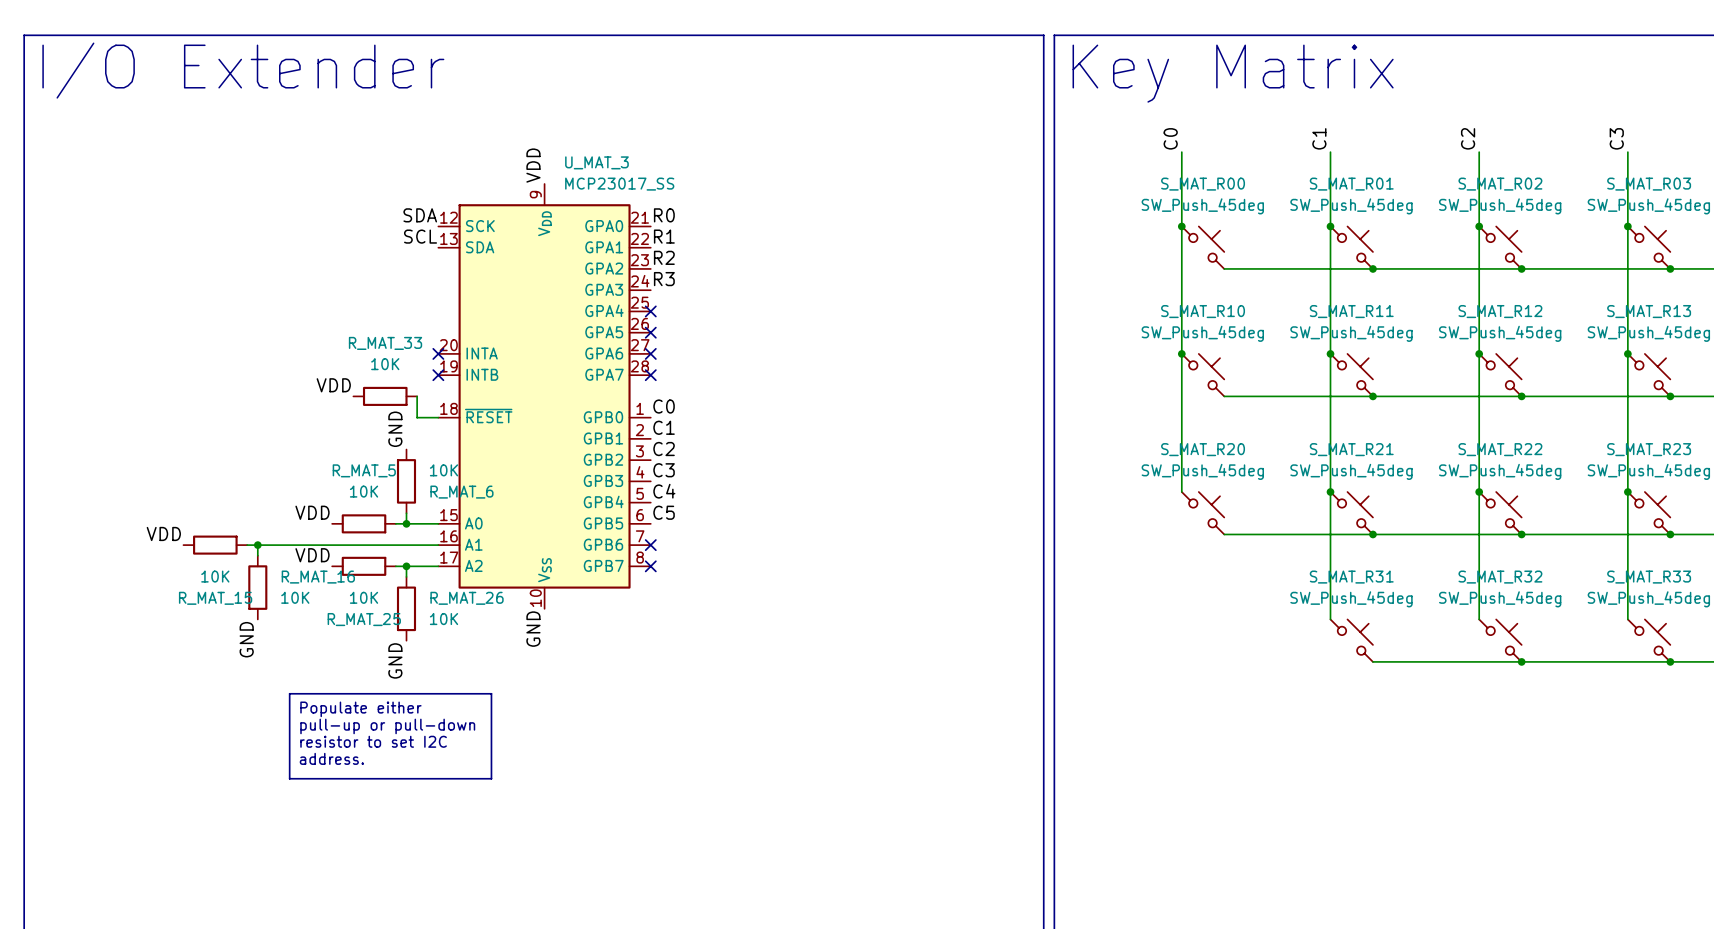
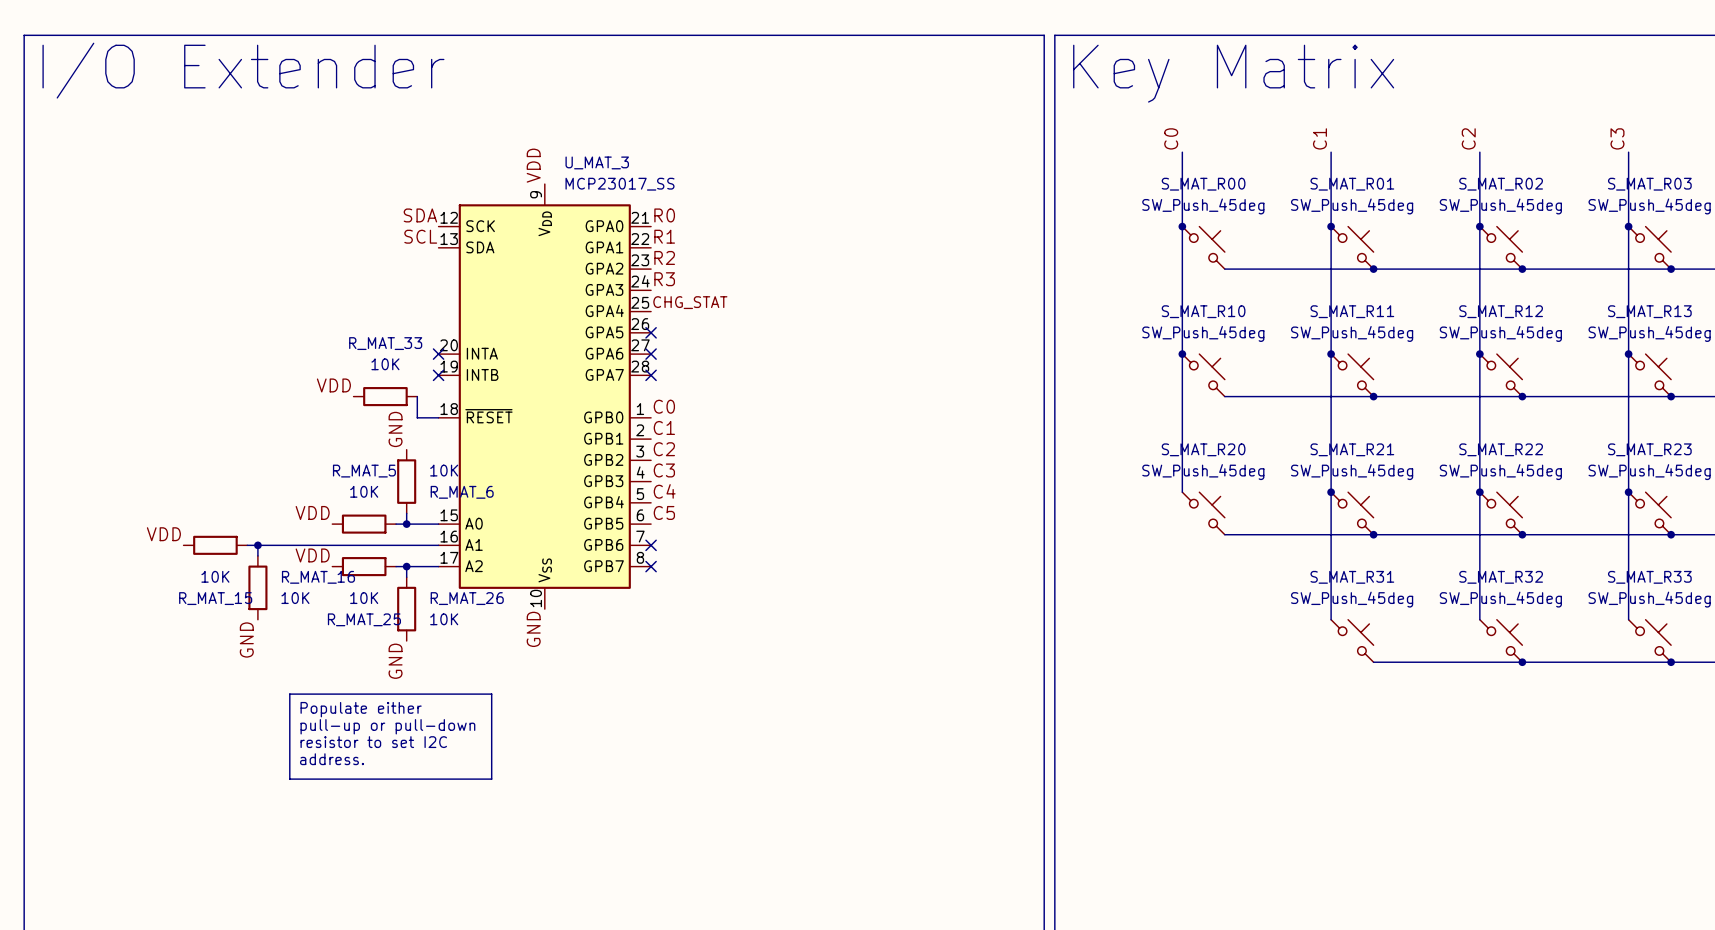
label: none -> CHG_STAT (690, 302)
no-connect mark: (650, 311) -> none

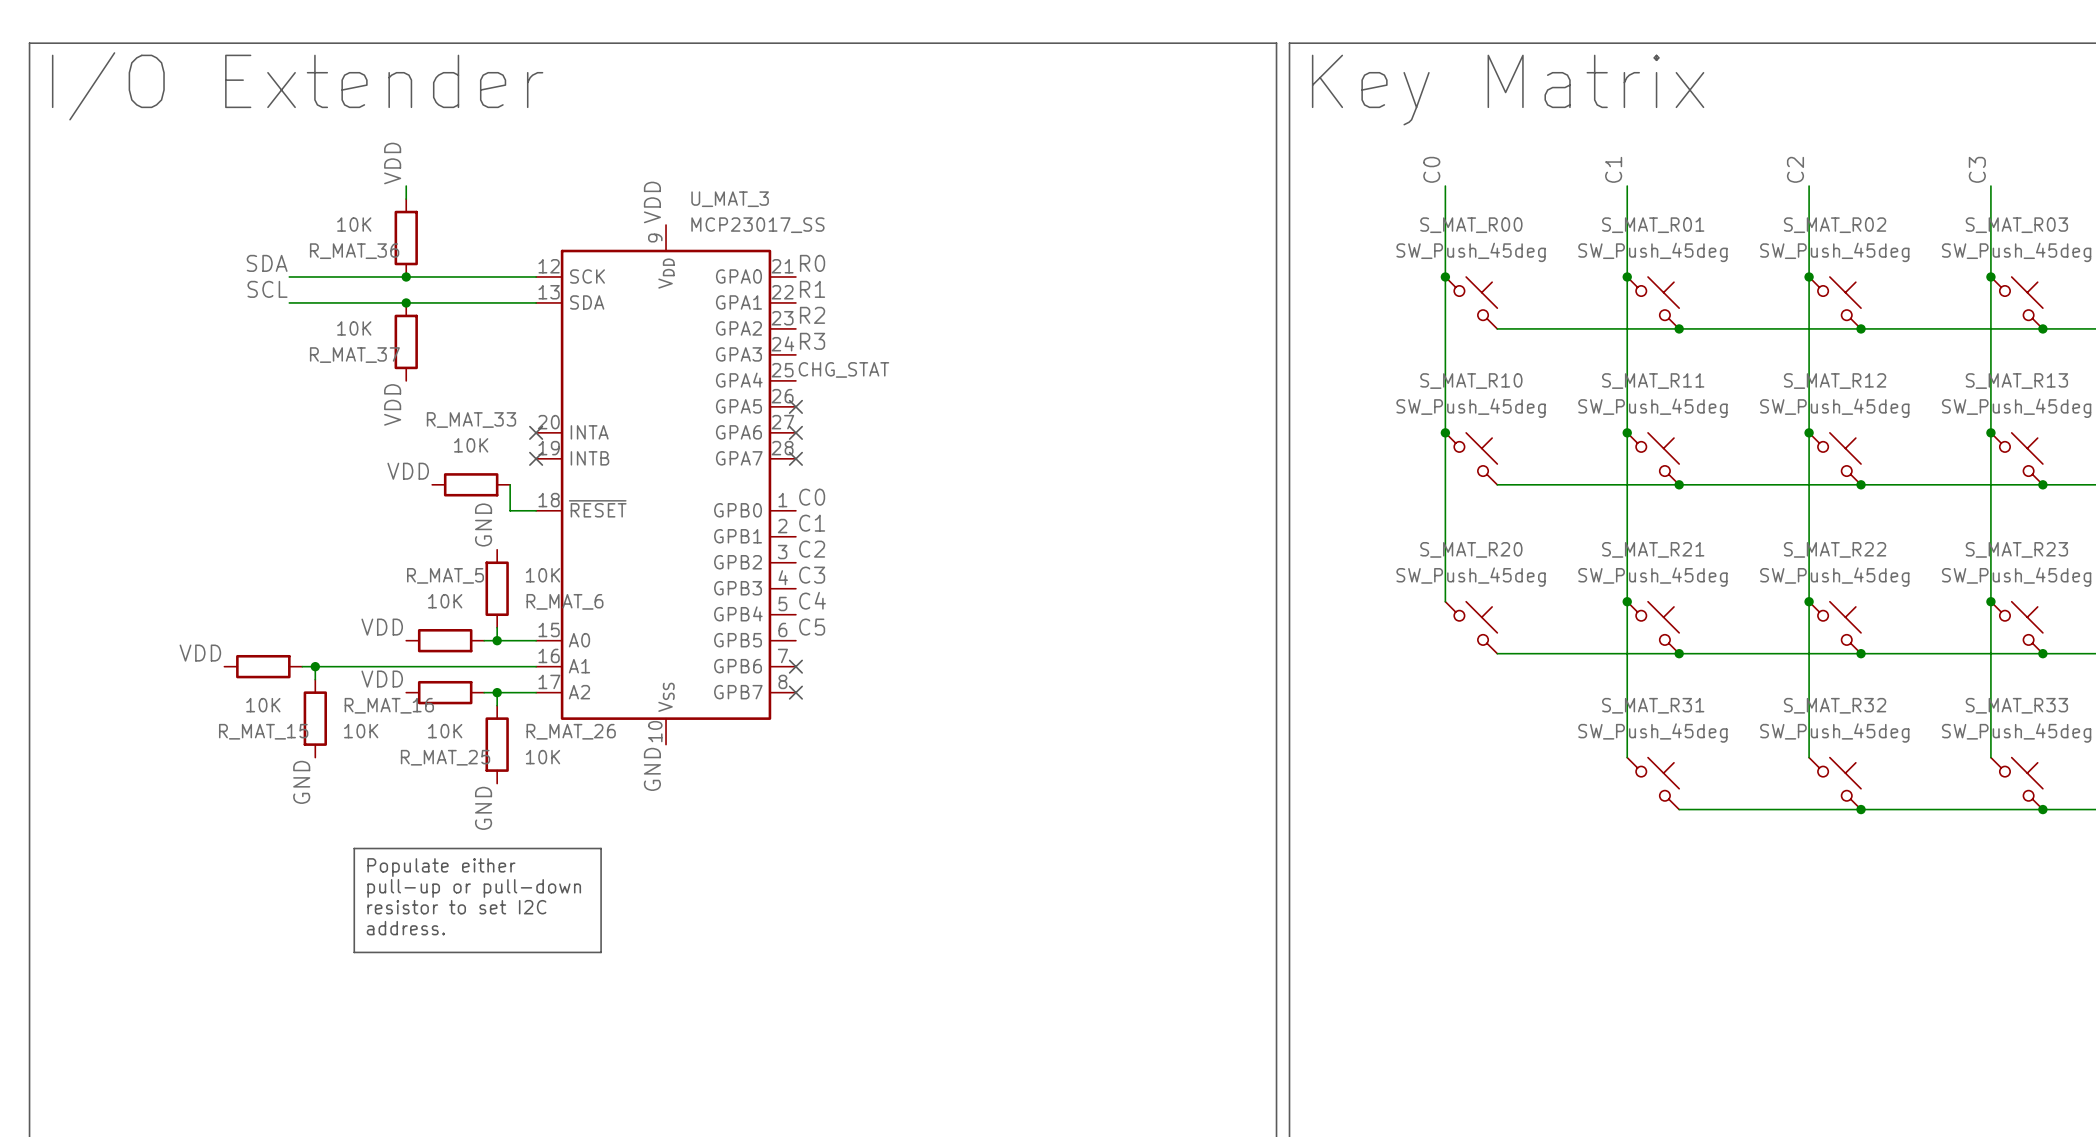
label: none -> VDD (392, 163)
wire: none -> (406, 186) (406, 199)
R_MAT_36: none -> 10K (406, 238)
label position: SDA (420, 215) -> SDA (267, 263)
wire: none -> (289, 276) (536, 276)
junction: none -> (406, 276)
label position: SCL (420, 236) -> SCL (267, 289)
wire: none -> (289, 302) (536, 302)
junction: none -> (406, 302)
R_MAT_37: none -> 10K (406, 341)
label: none -> VDD (392, 404)

